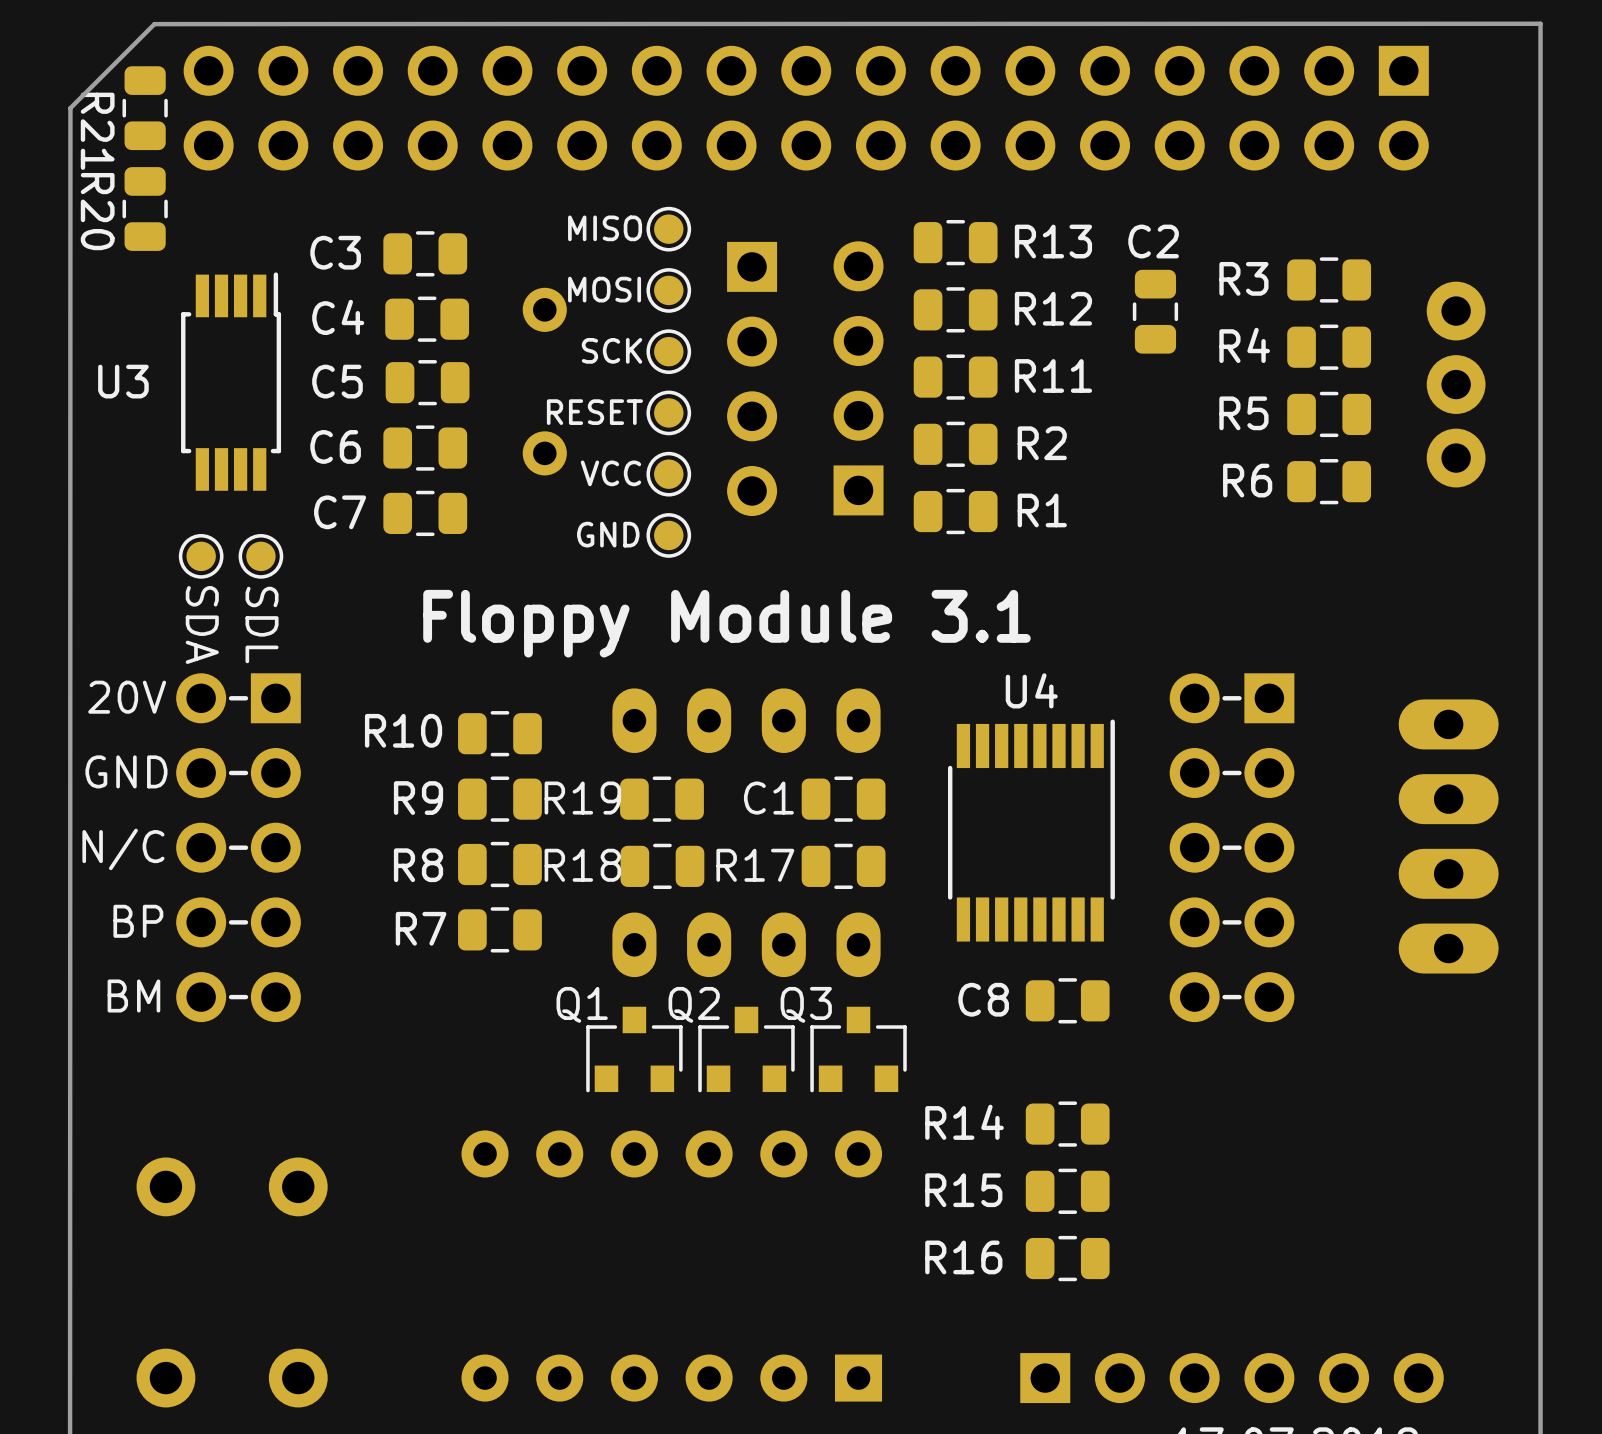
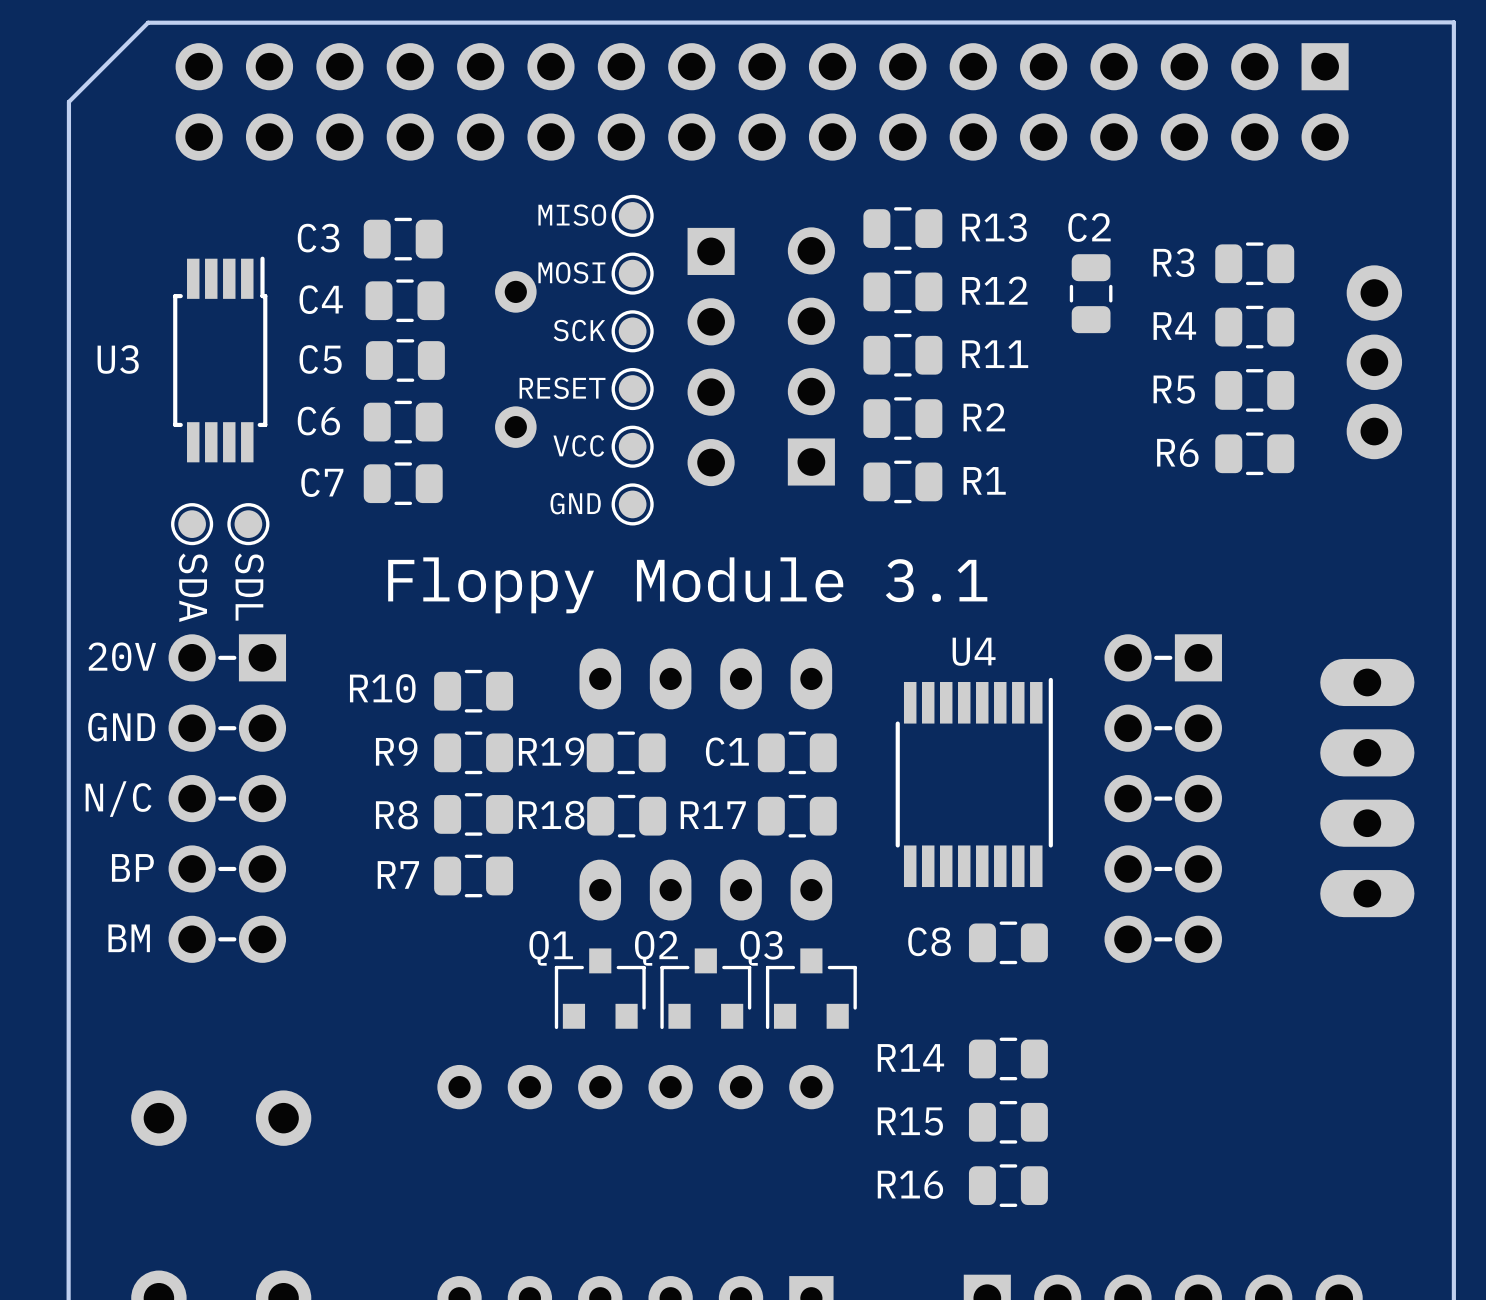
R21: (145, 108) -> none
R20: (145, 209) -> none

